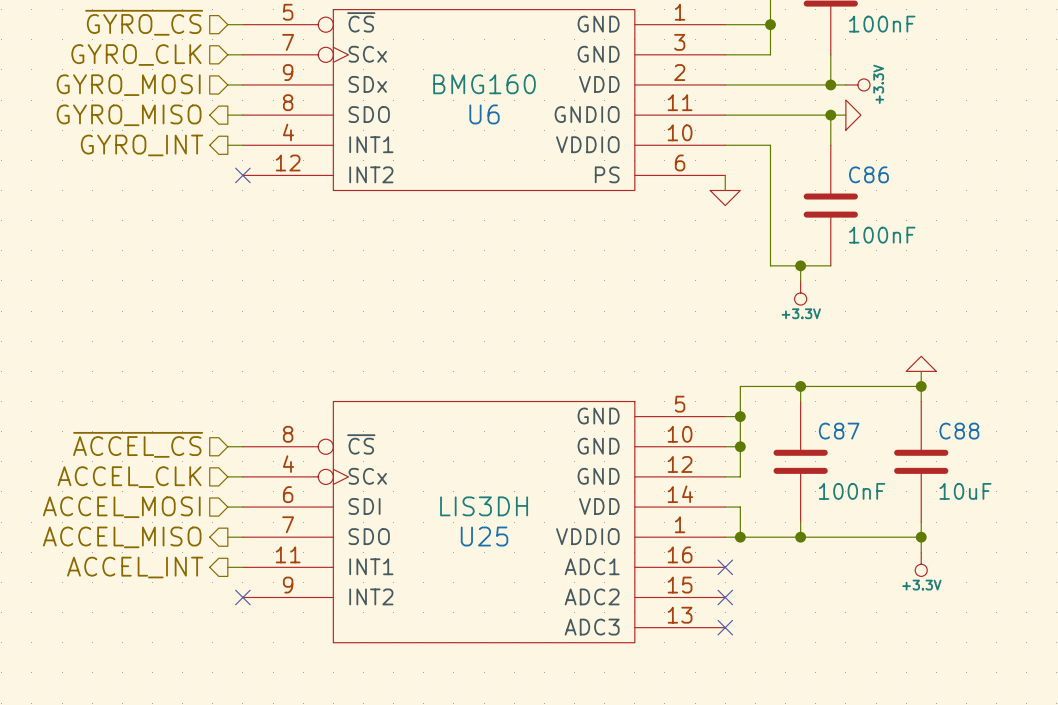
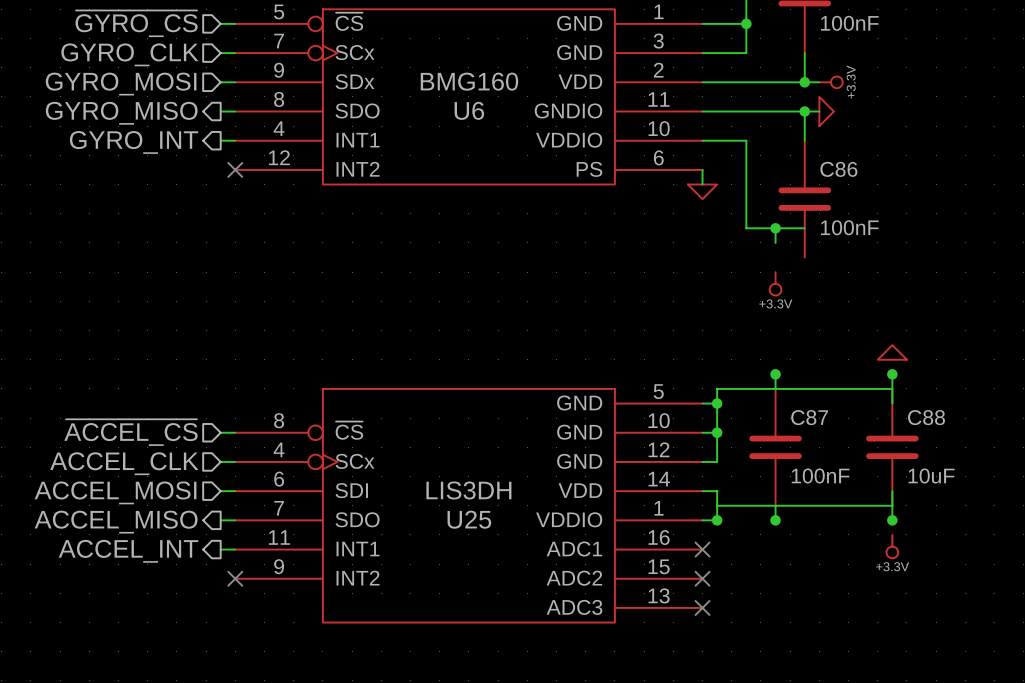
wire: (770, 235) (770, 265) (830, 265) -> (746, 228) (804, 228)
wire: (800, 265) (800, 280) -> (775, 228) (775, 242)
junction position: (800, 265) -> (775, 228)
wire: (921, 371) (921, 386) (740, 386) (740, 401) -> (892, 403) (892, 388) (717, 388)
wire: none -> (892, 491) (892, 505) (717, 505)
wire: (740, 537) (921, 537) (921, 552) -> none

